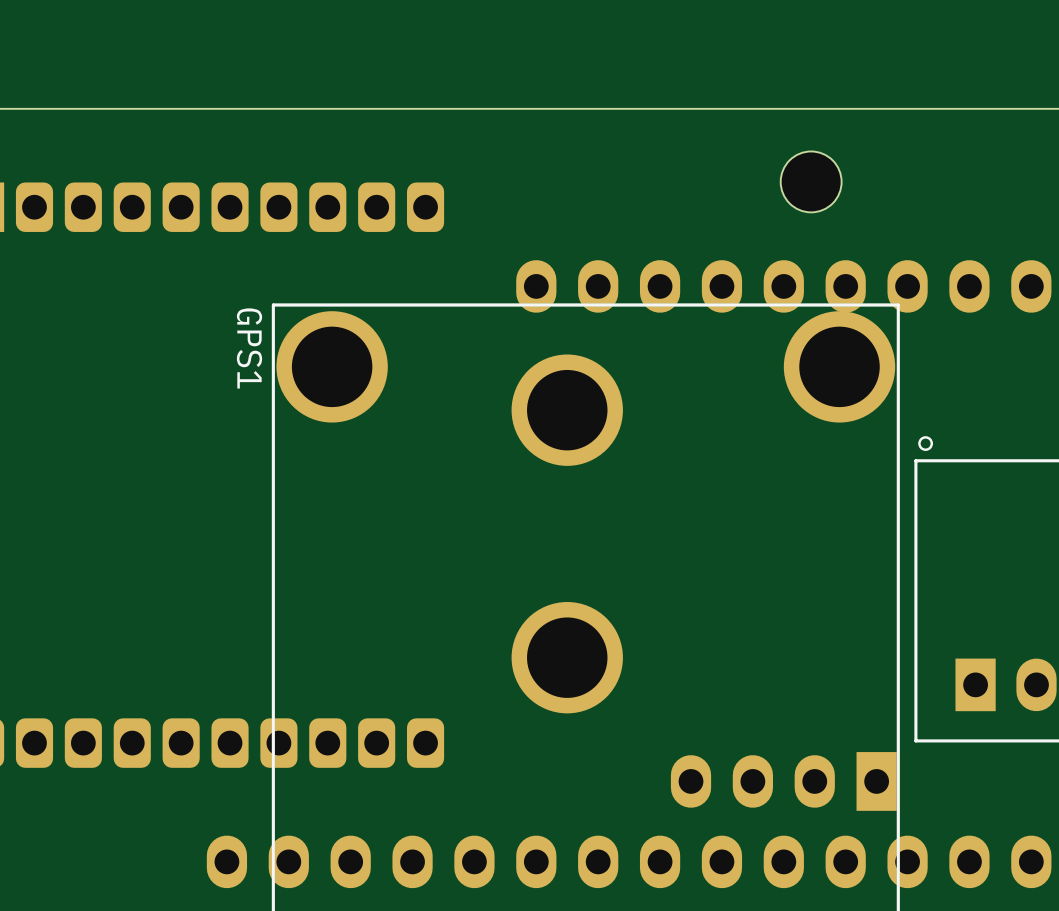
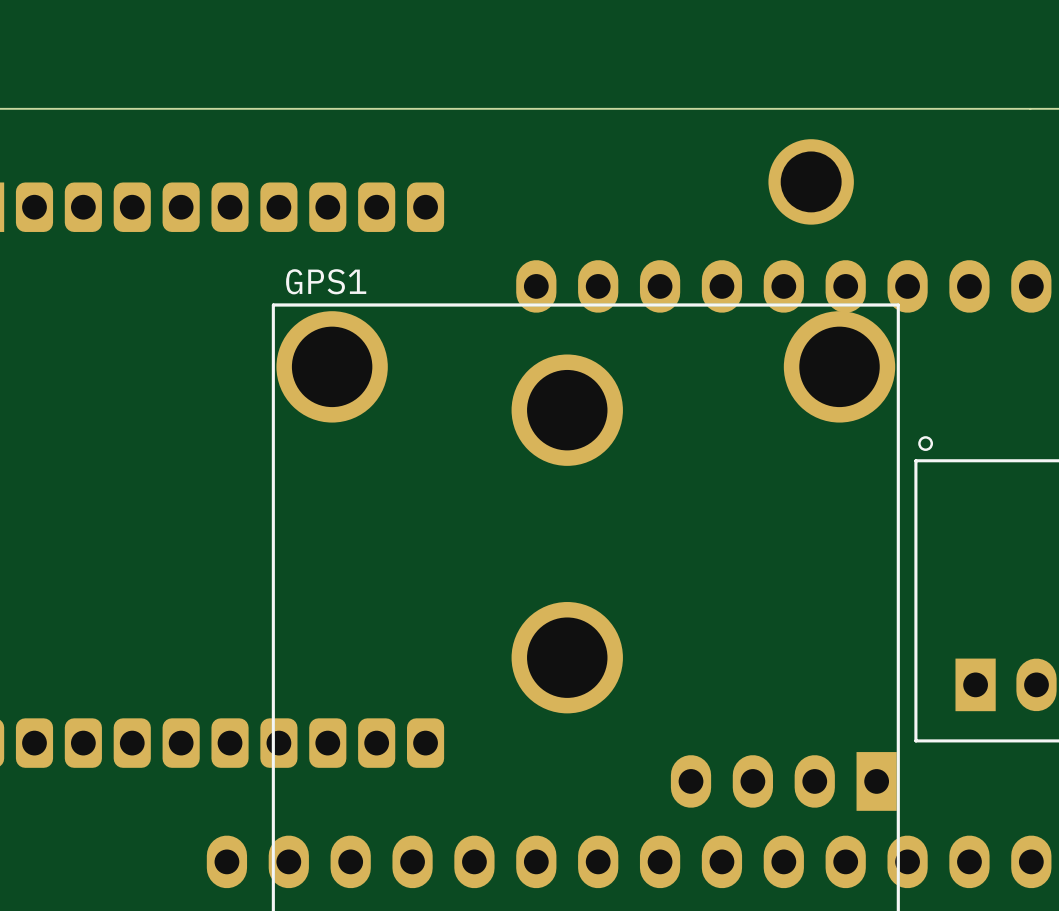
part footprint: [780, 151, 842, 213] -> [768, 139, 854, 225]
GPS1 name rotation: 0° (249, 348) -> 90° counterclockwise (326, 281)

